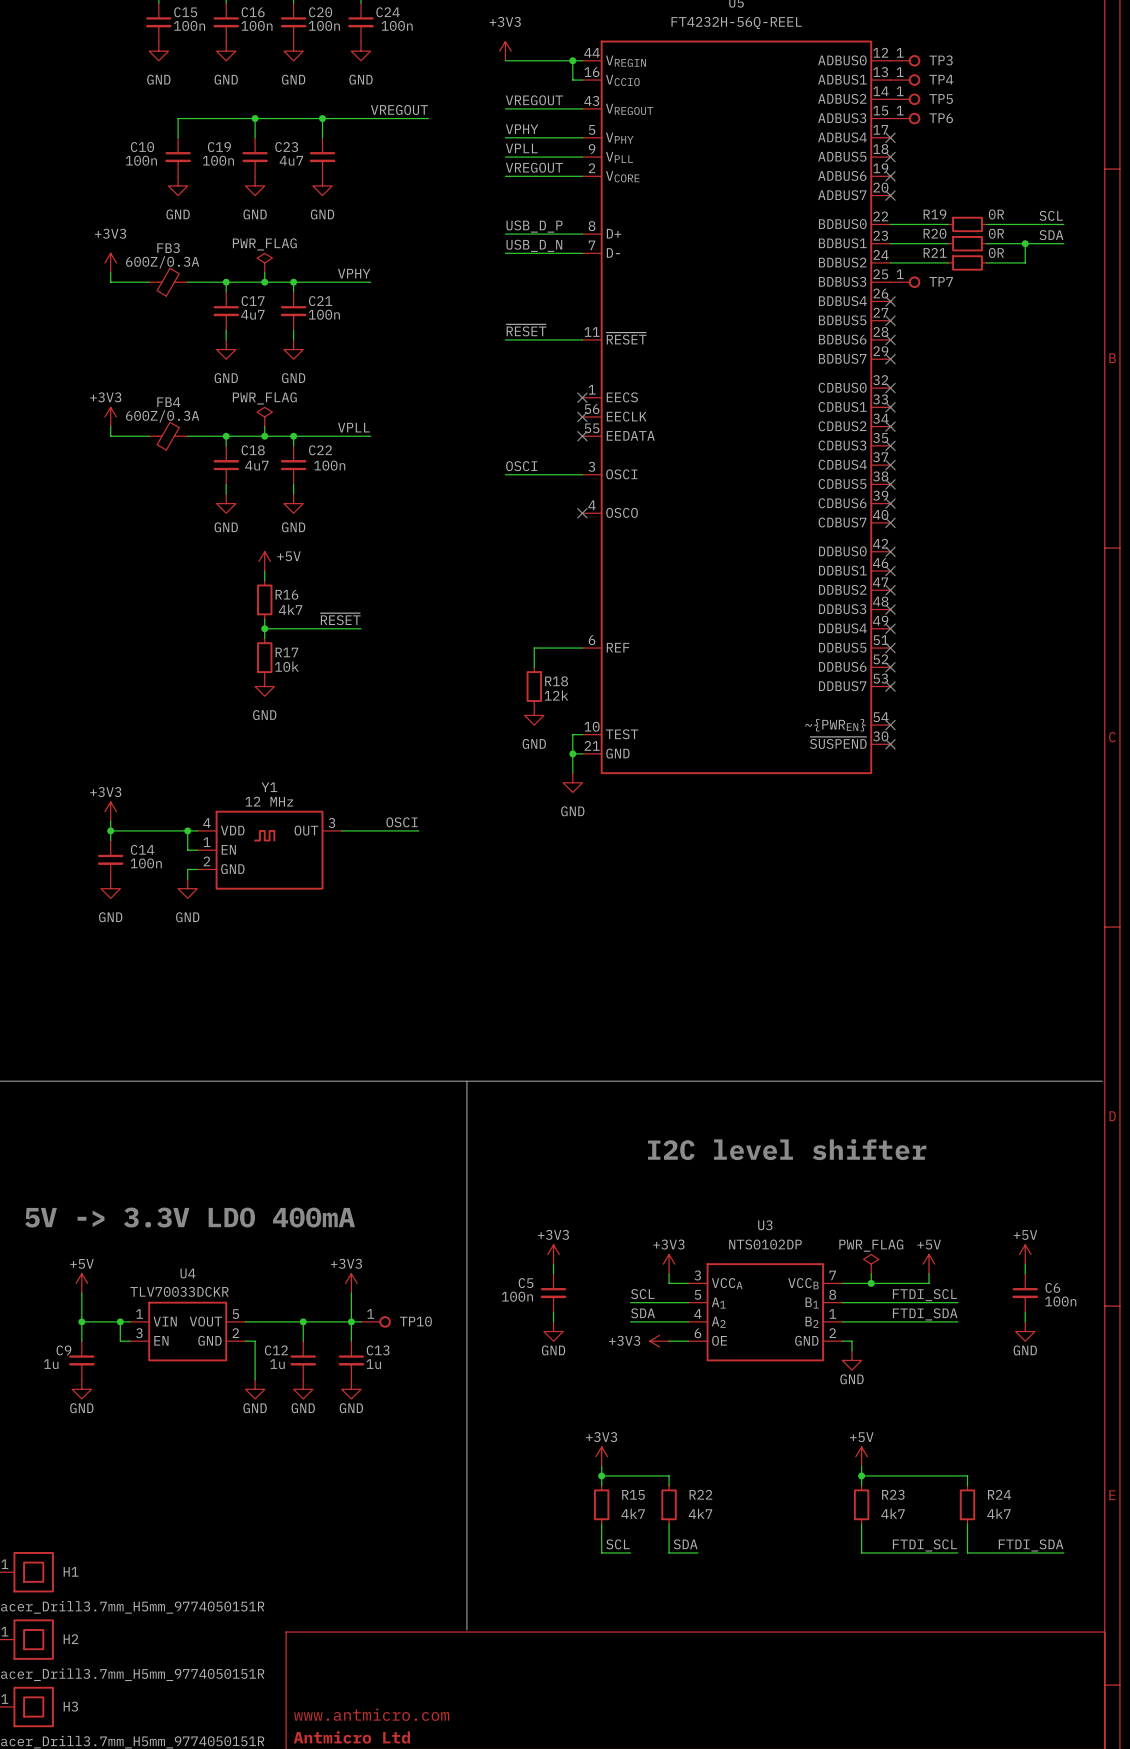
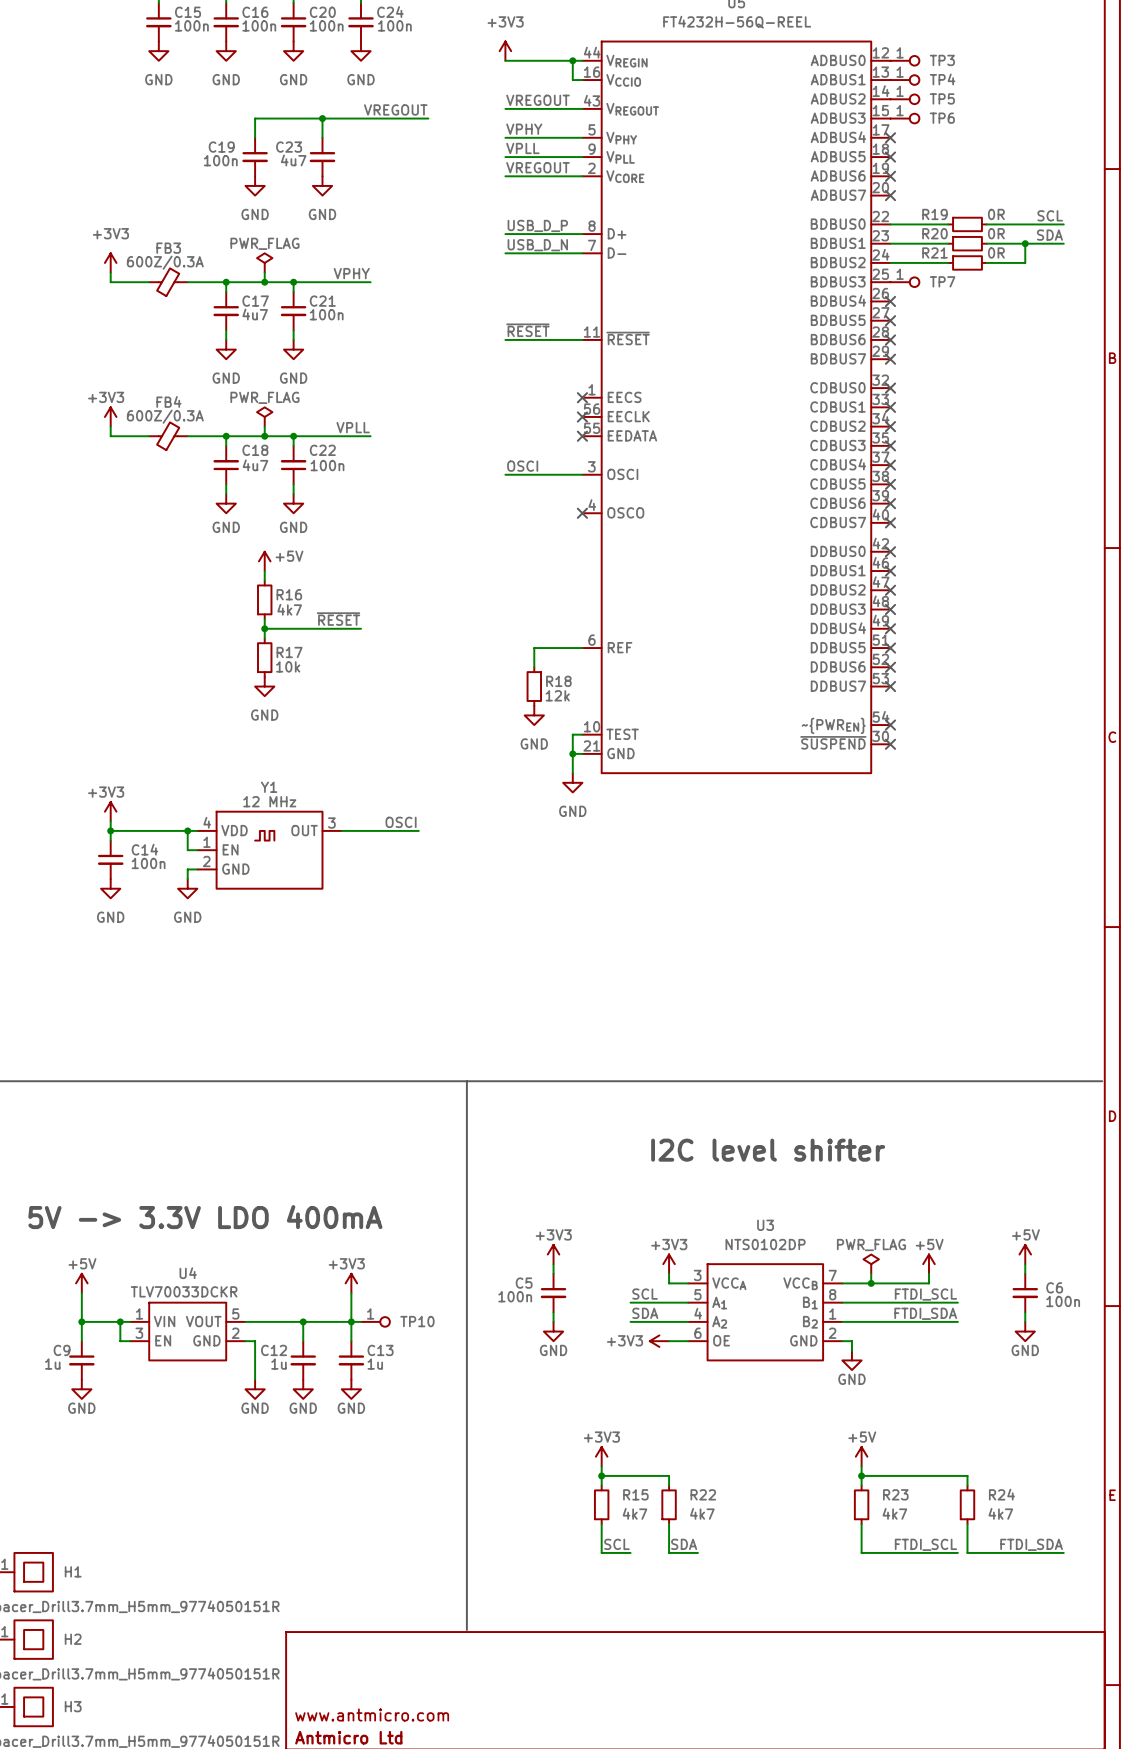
wire: (255, 118) (178, 118) (178, 137) -> none
junction: (255, 118) -> none
C10: (178, 157) -> none
power symbol: GND (178, 185) -> none

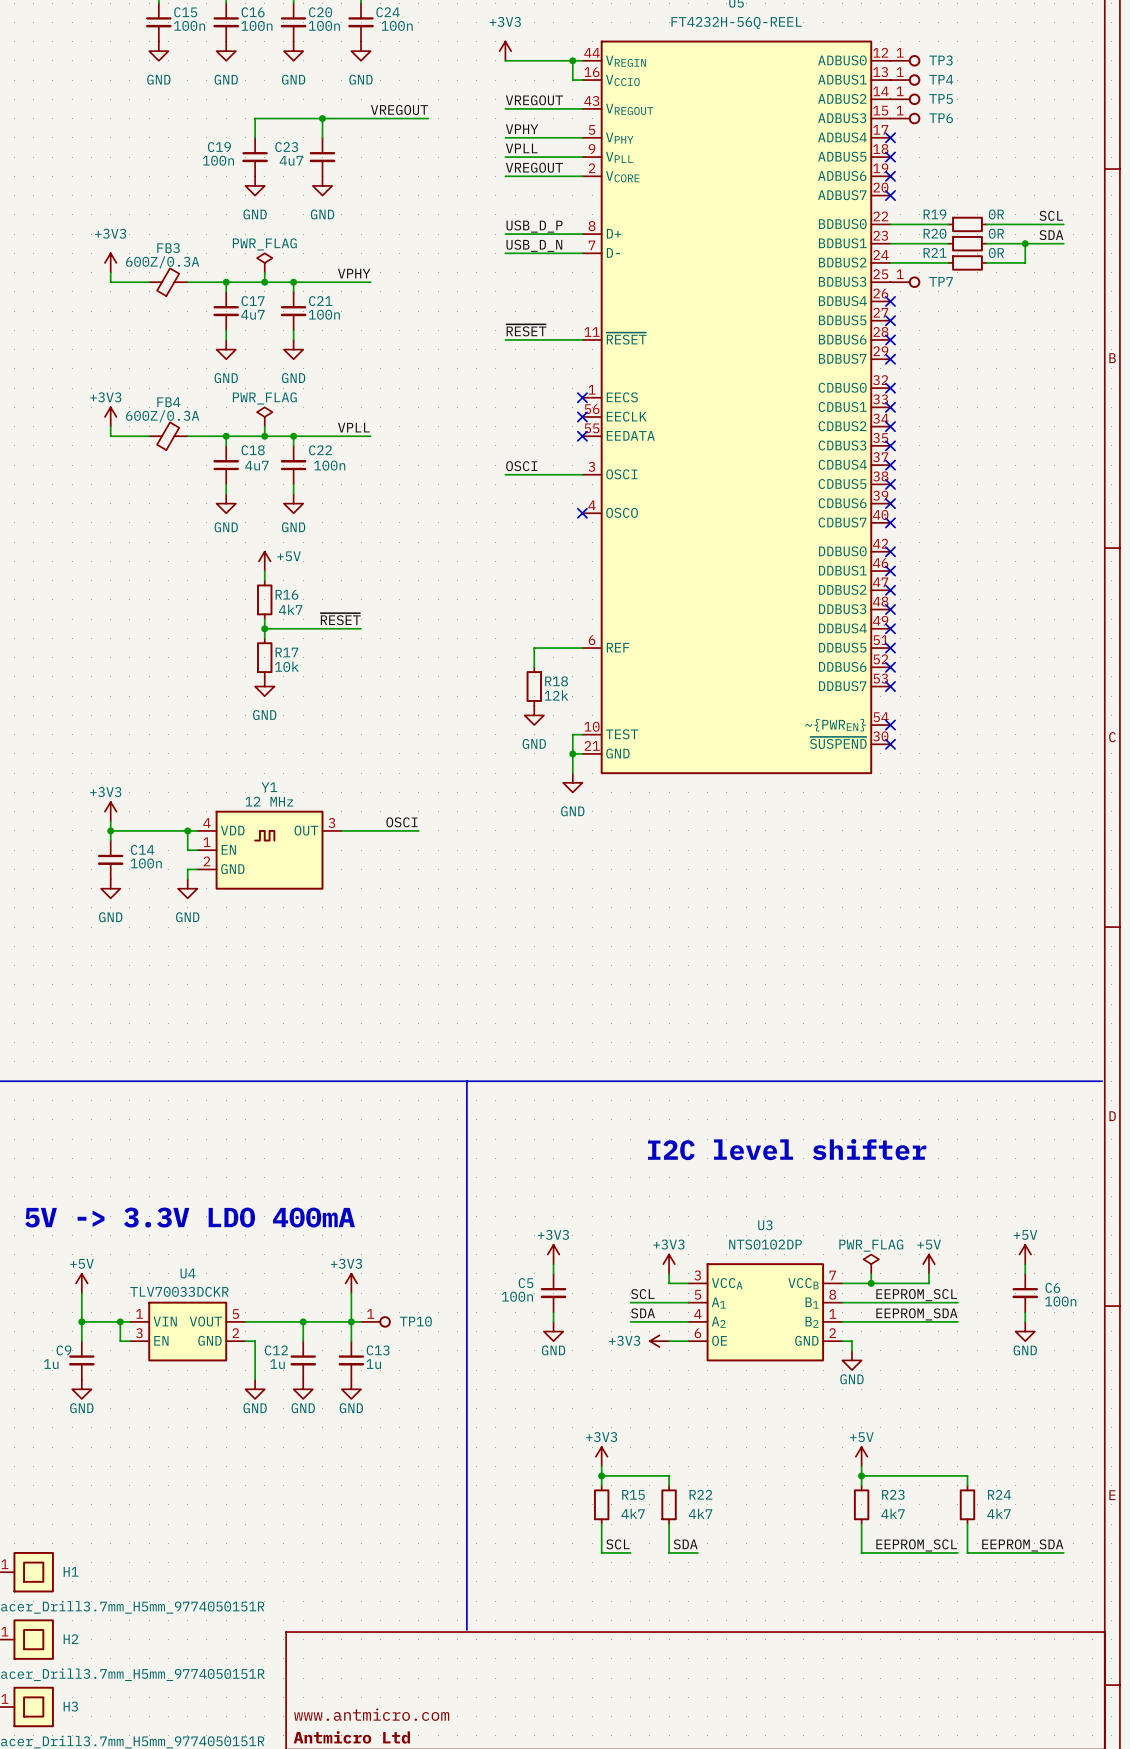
label: FTDI_SCL (925, 1294) -> EEPROM_SCL (916, 1295)
label: FTDI_SDA (925, 1313) -> EEPROM_SDA (916, 1314)
label: FTDI_SCL (925, 1544) -> EEPROM_SCL (916, 1545)
label: FTDI_SDA (1031, 1544) -> EEPROM_SDA (1022, 1545)

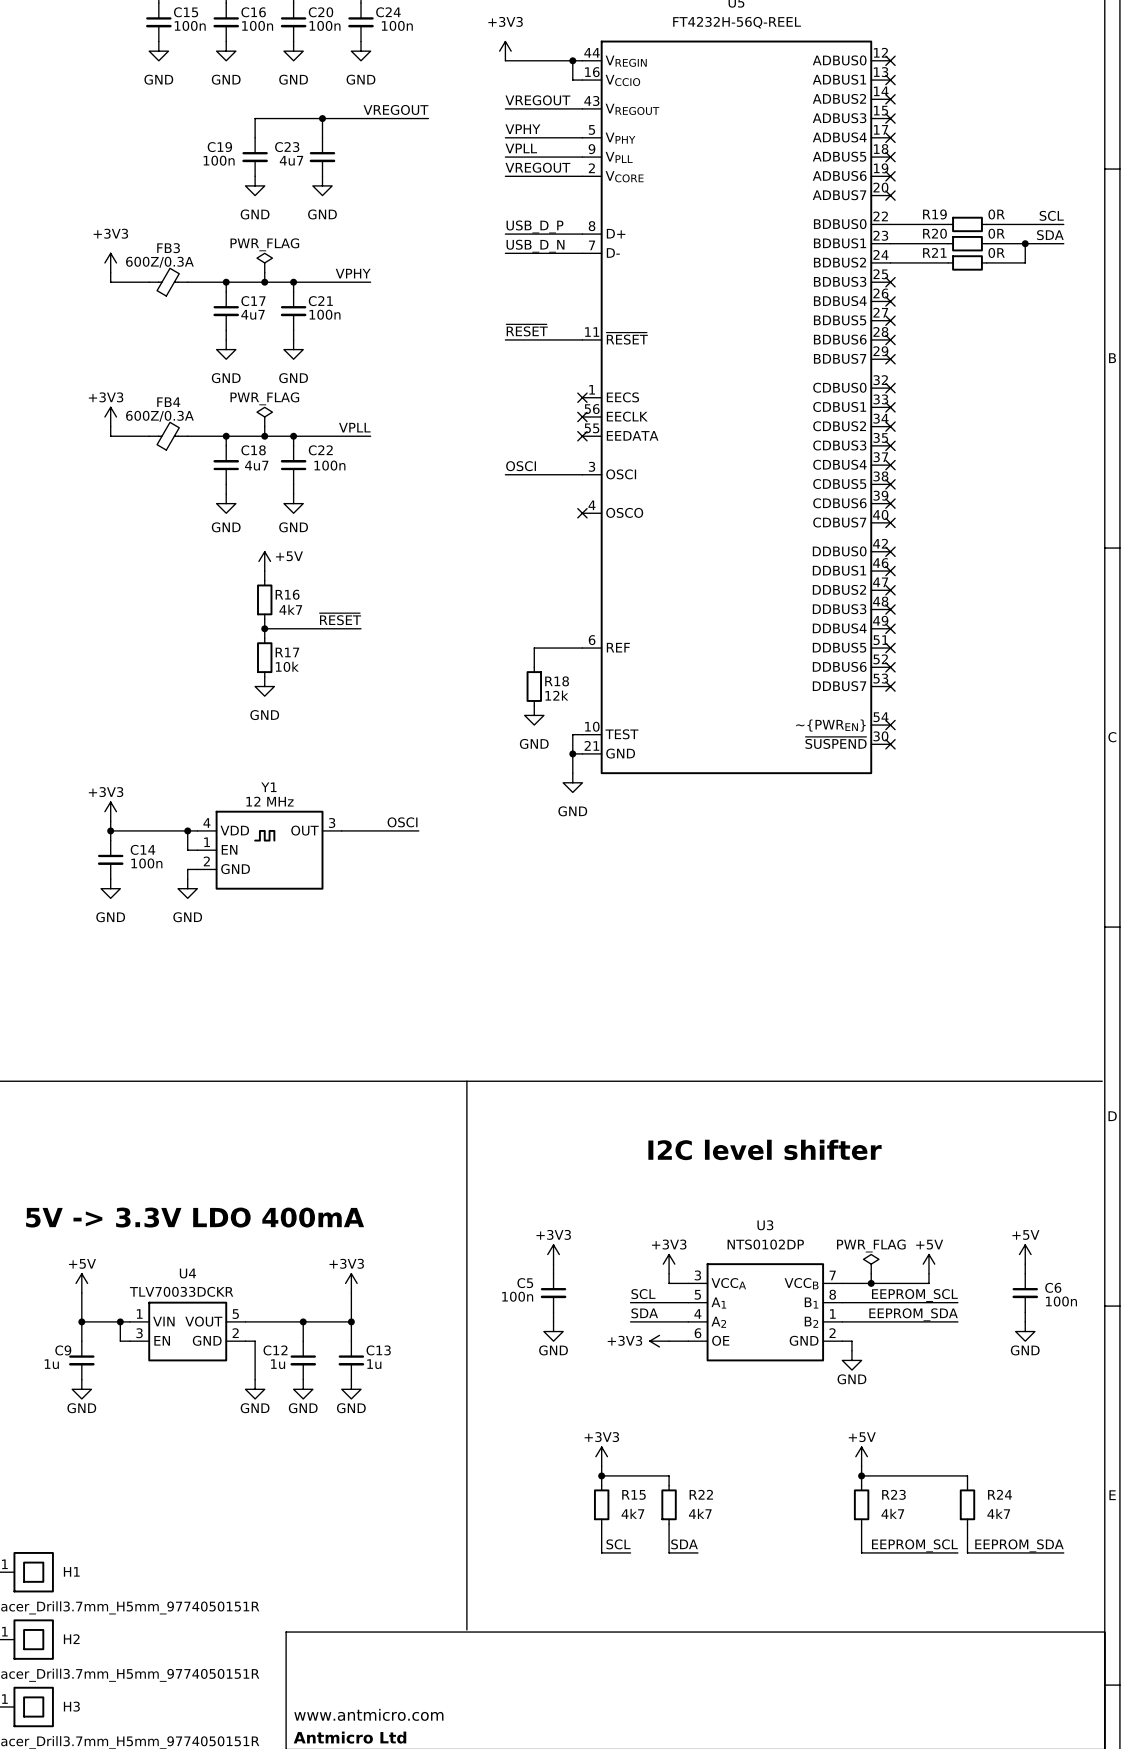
no-connect mark: none -> (890, 60)
TP3: (905, 60) -> none
no-connect mark: none -> (890, 80)
TP4: (905, 80) -> none
no-connect mark: none -> (890, 99)
TP5: (905, 99) -> none
no-connect mark: none -> (890, 118)
TP6: (905, 118) -> none
no-connect mark: none -> (890, 282)
TP7: (905, 282) -> none
wire: (351, 1321) (361, 1321) -> none
TP10: (375, 1321) -> none

